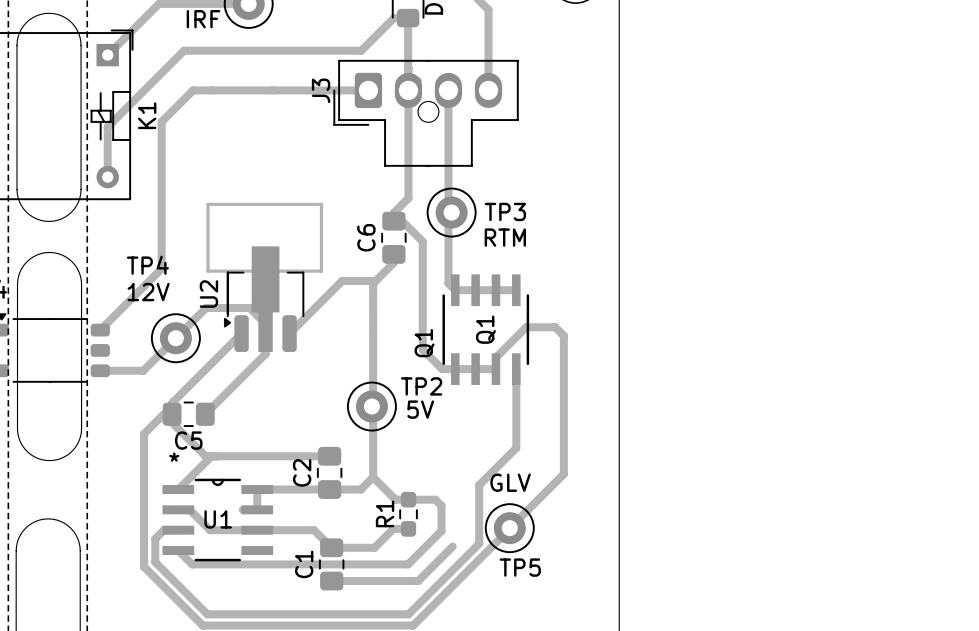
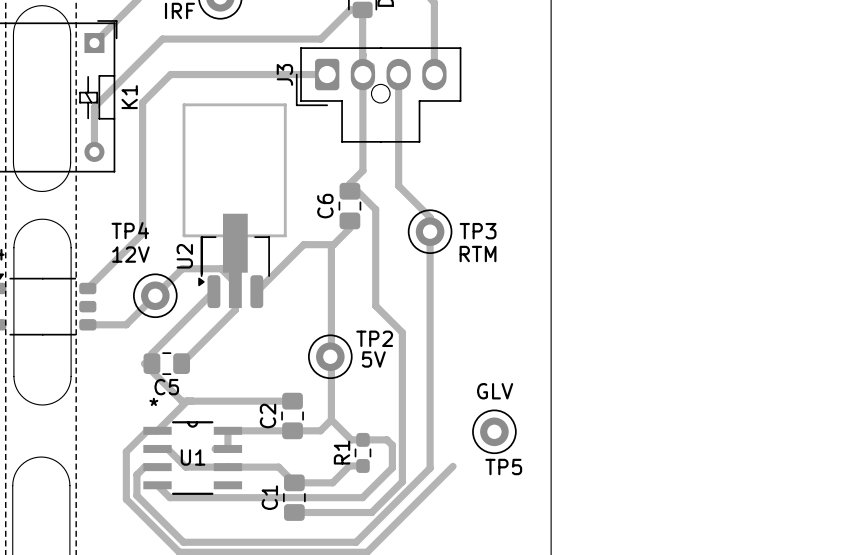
track: (208, 204) (321, 204) -> (184, 176) (184, 104) (285, 104) (285, 176)
TP3 position: (451, 212) -> (430, 231)
track: (448, 215) (448, 283) (455, 290) (516, 290) -> none
Q1: (485, 329) -> none
track: (442, 369) (495, 369) (495, 357) (526, 327) (554, 326) (563, 335) (563, 474) (509, 528) -> (393, 323) (402, 332) (402, 481)
track: (516, 369) (516, 448) (479, 485) (479, 543) (408, 614) (400, 614) -> (398, 185) (430, 217) (430, 468) (356, 542)
track: (163, 414) (144, 433) (144, 566) -> (157, 430) (147, 430) (126, 451) (126, 499)
TP5 position: (509, 528) -> (494, 431)

